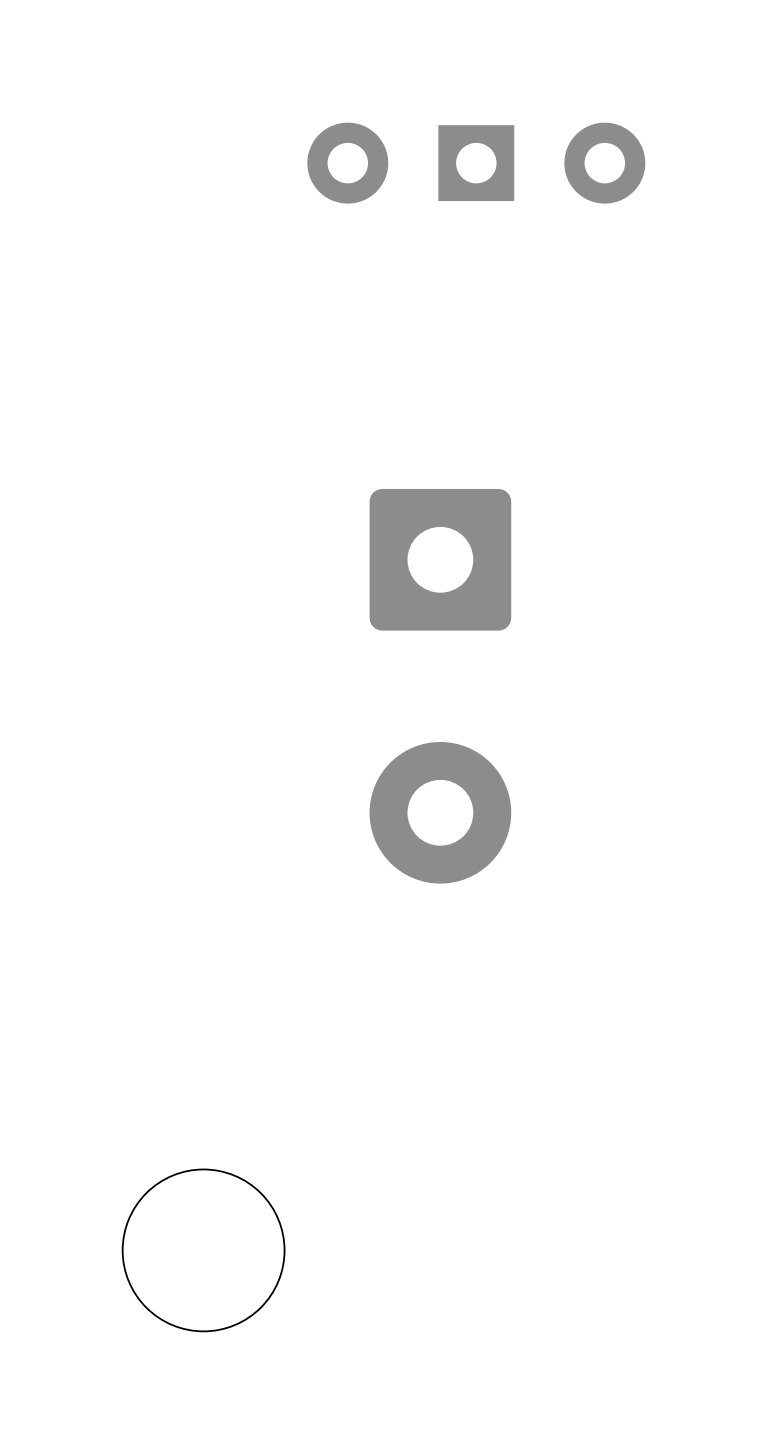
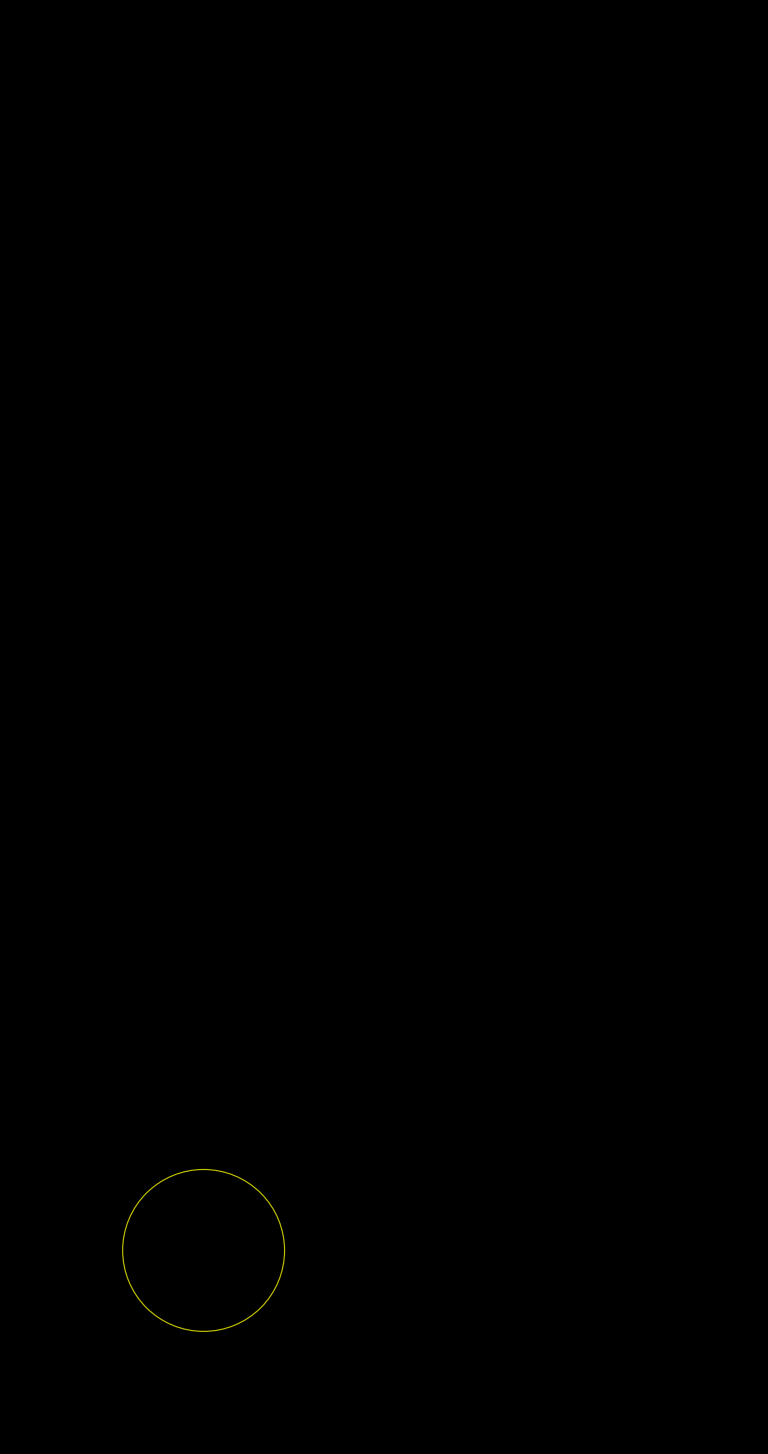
part: (476, 163) -> none
part: (440, 686) -> none

